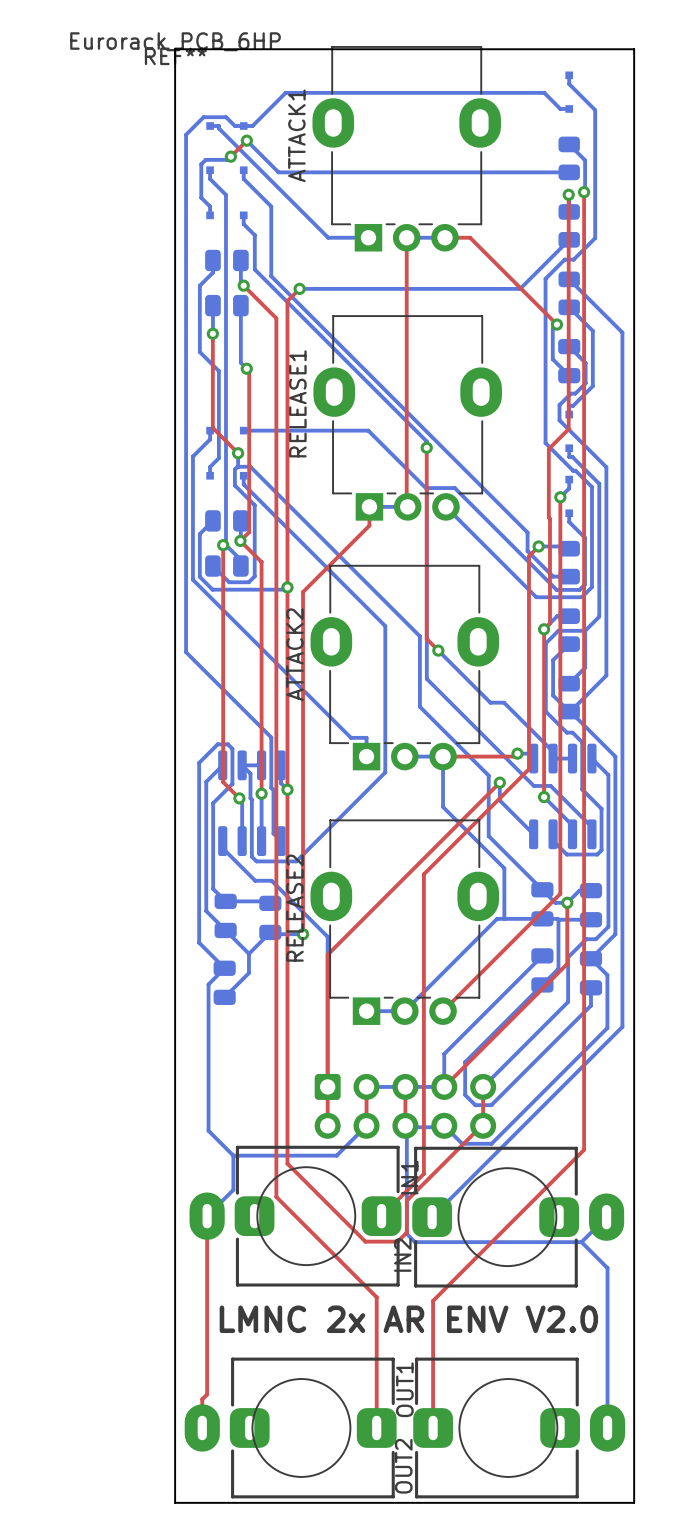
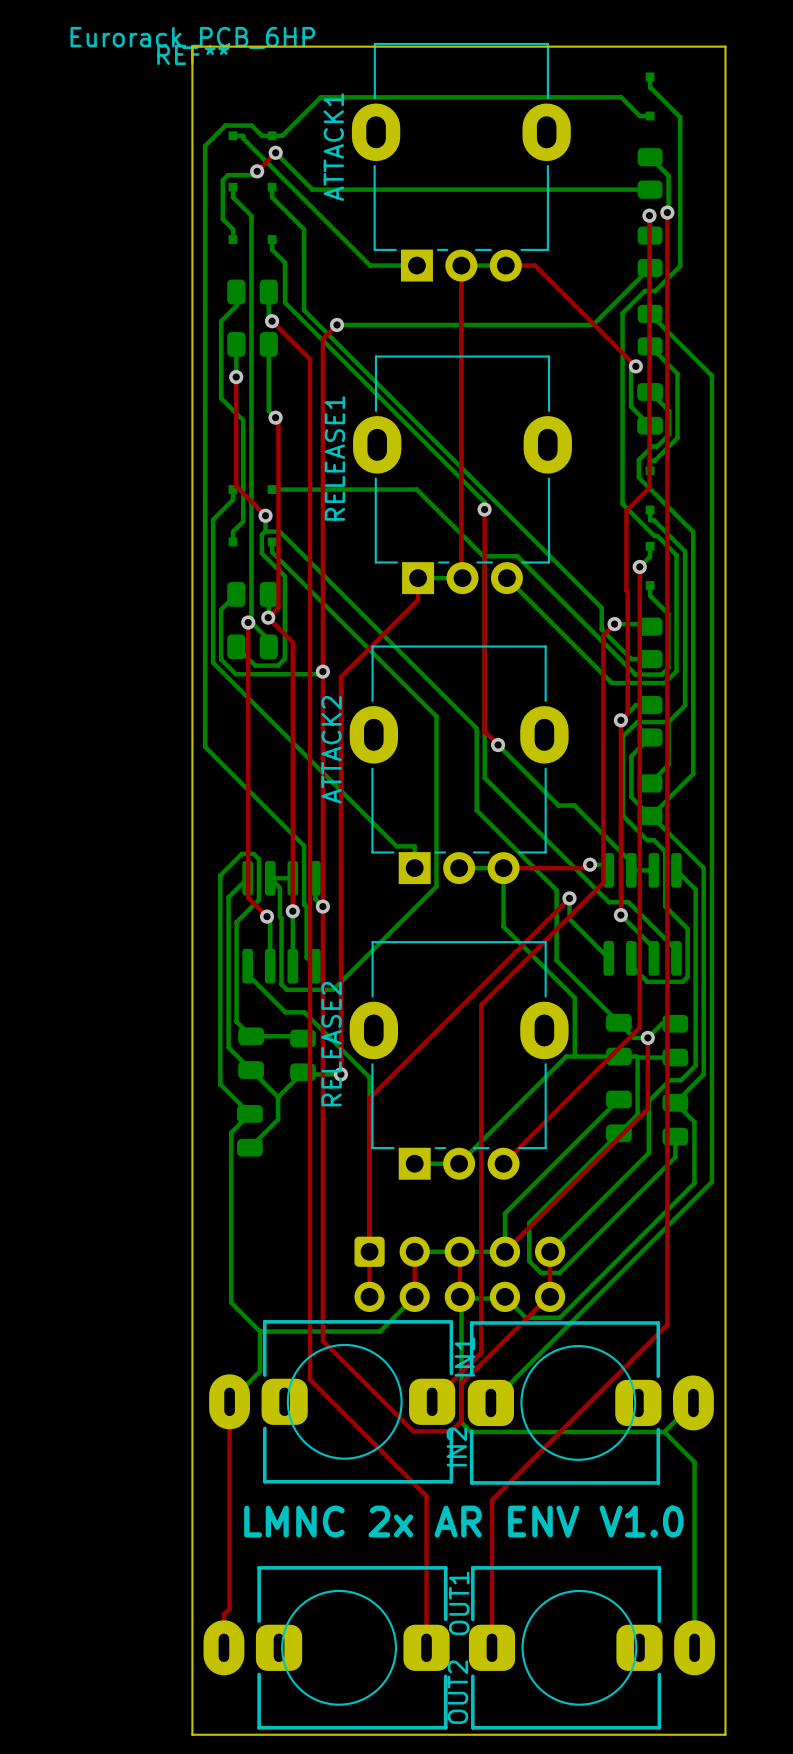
text: LMNC 2x AR ENV V2.0 (408, 1319) -> LMNC 2x AR ENV V1.0 (463, 1521)

